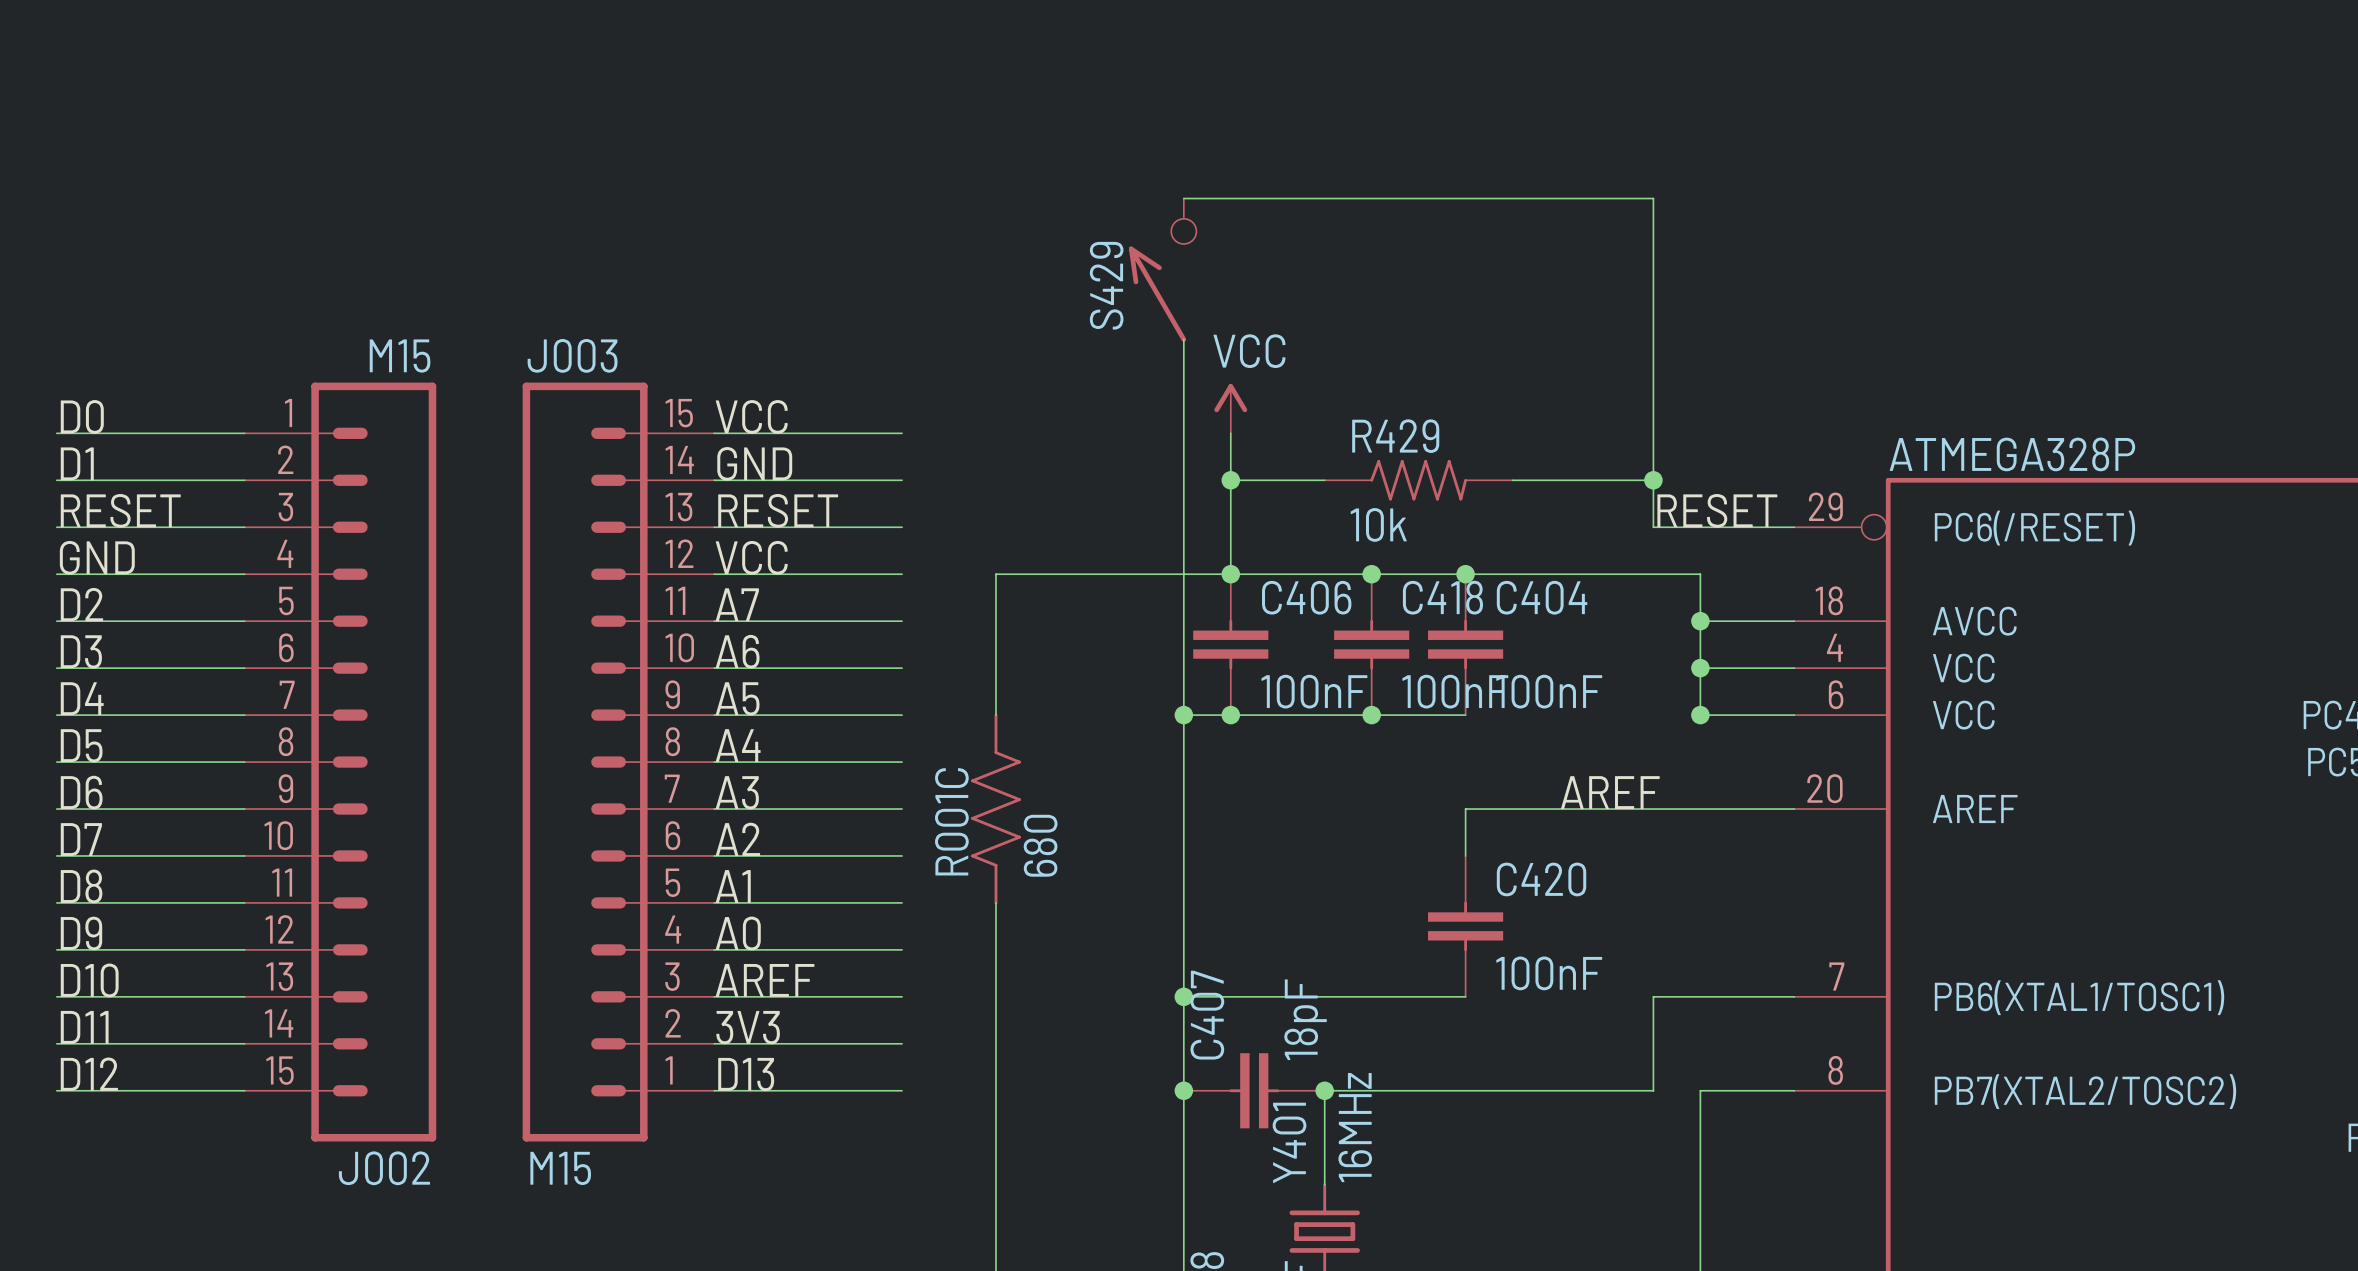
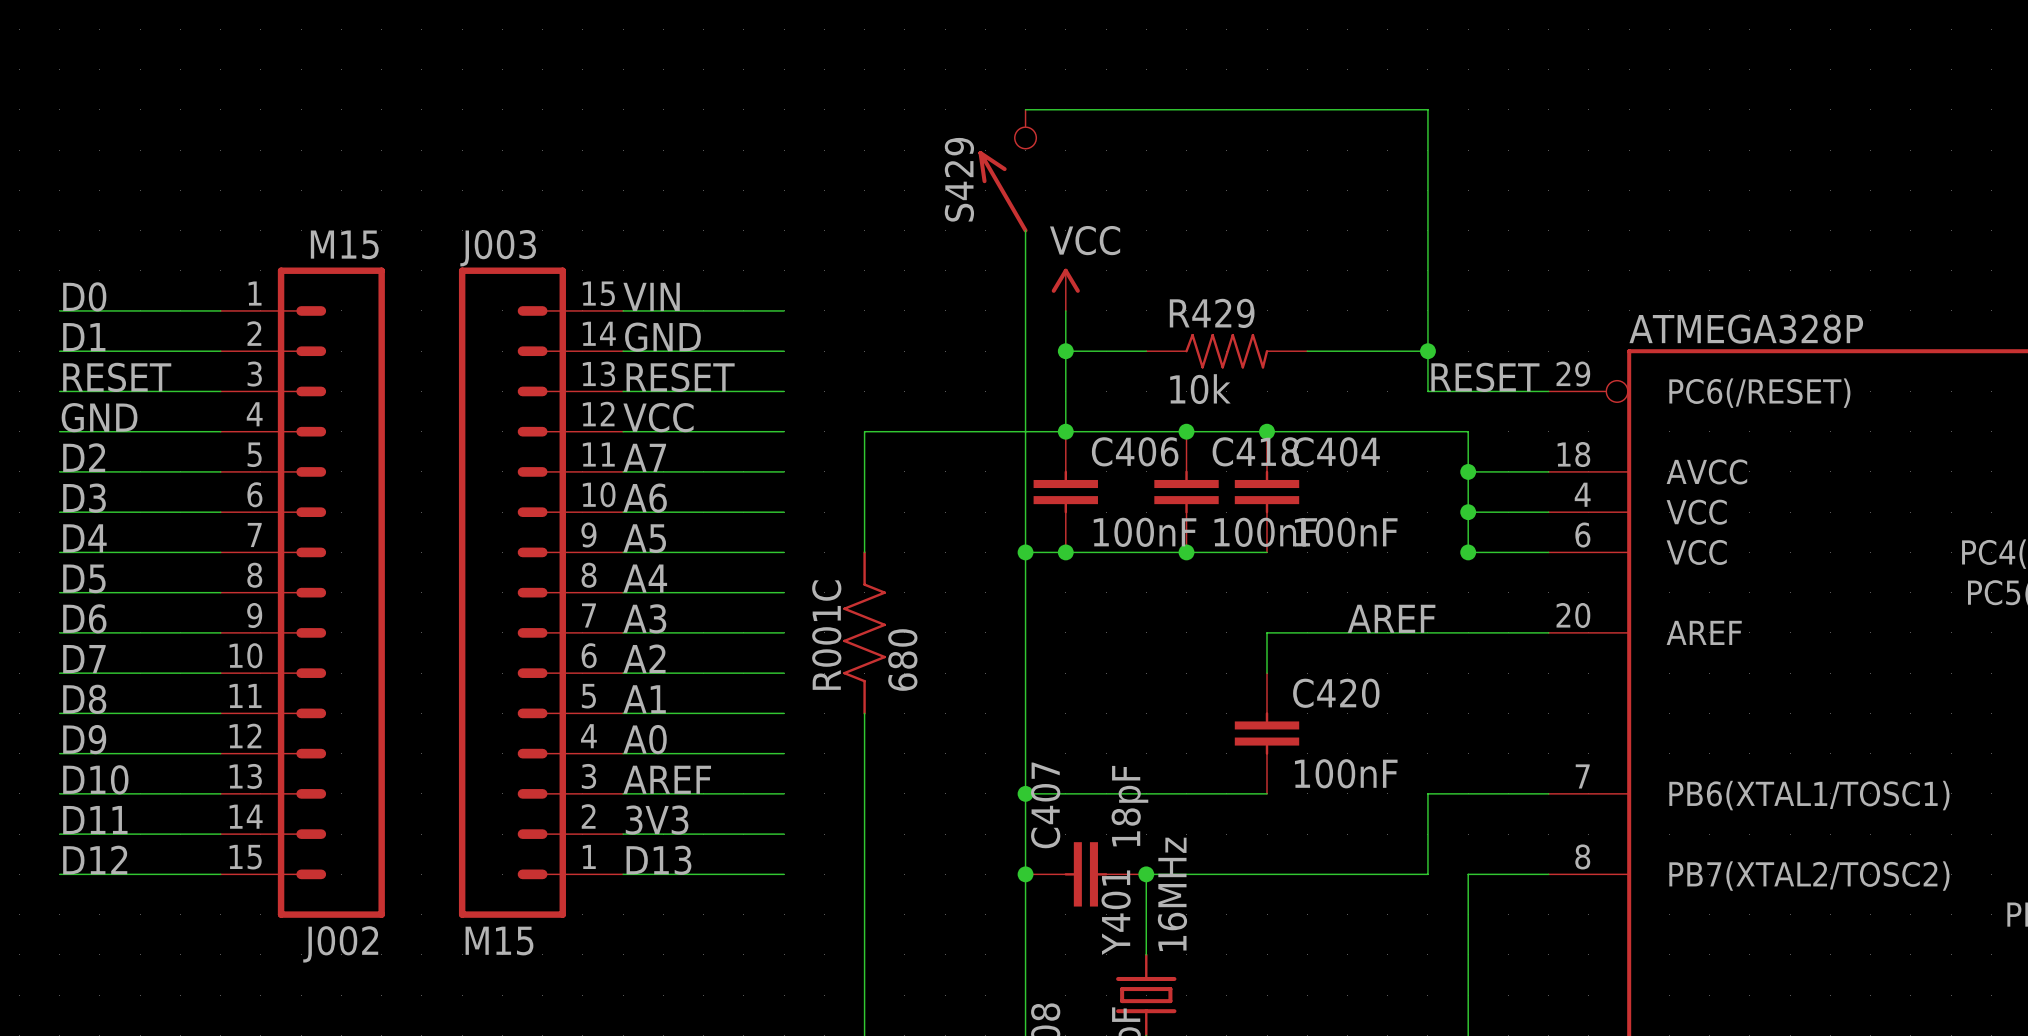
label: VCC (751, 416) -> VIN (651, 296)

